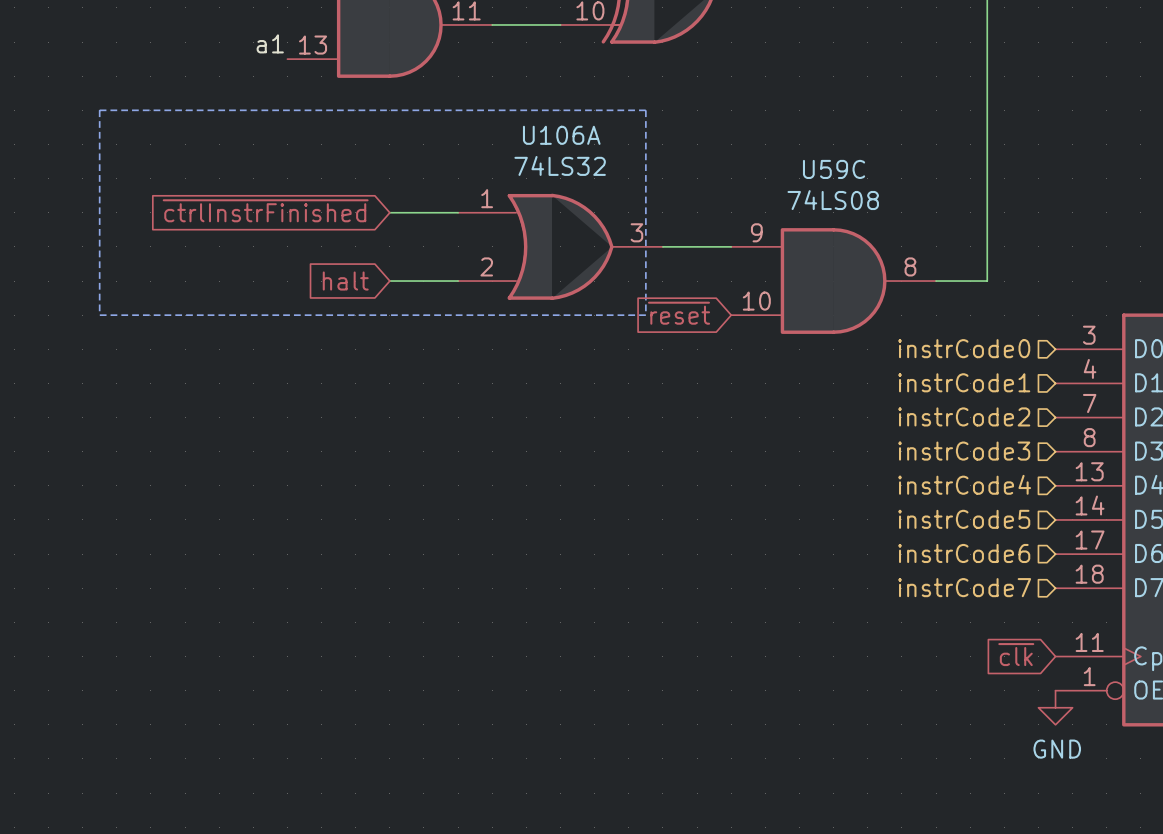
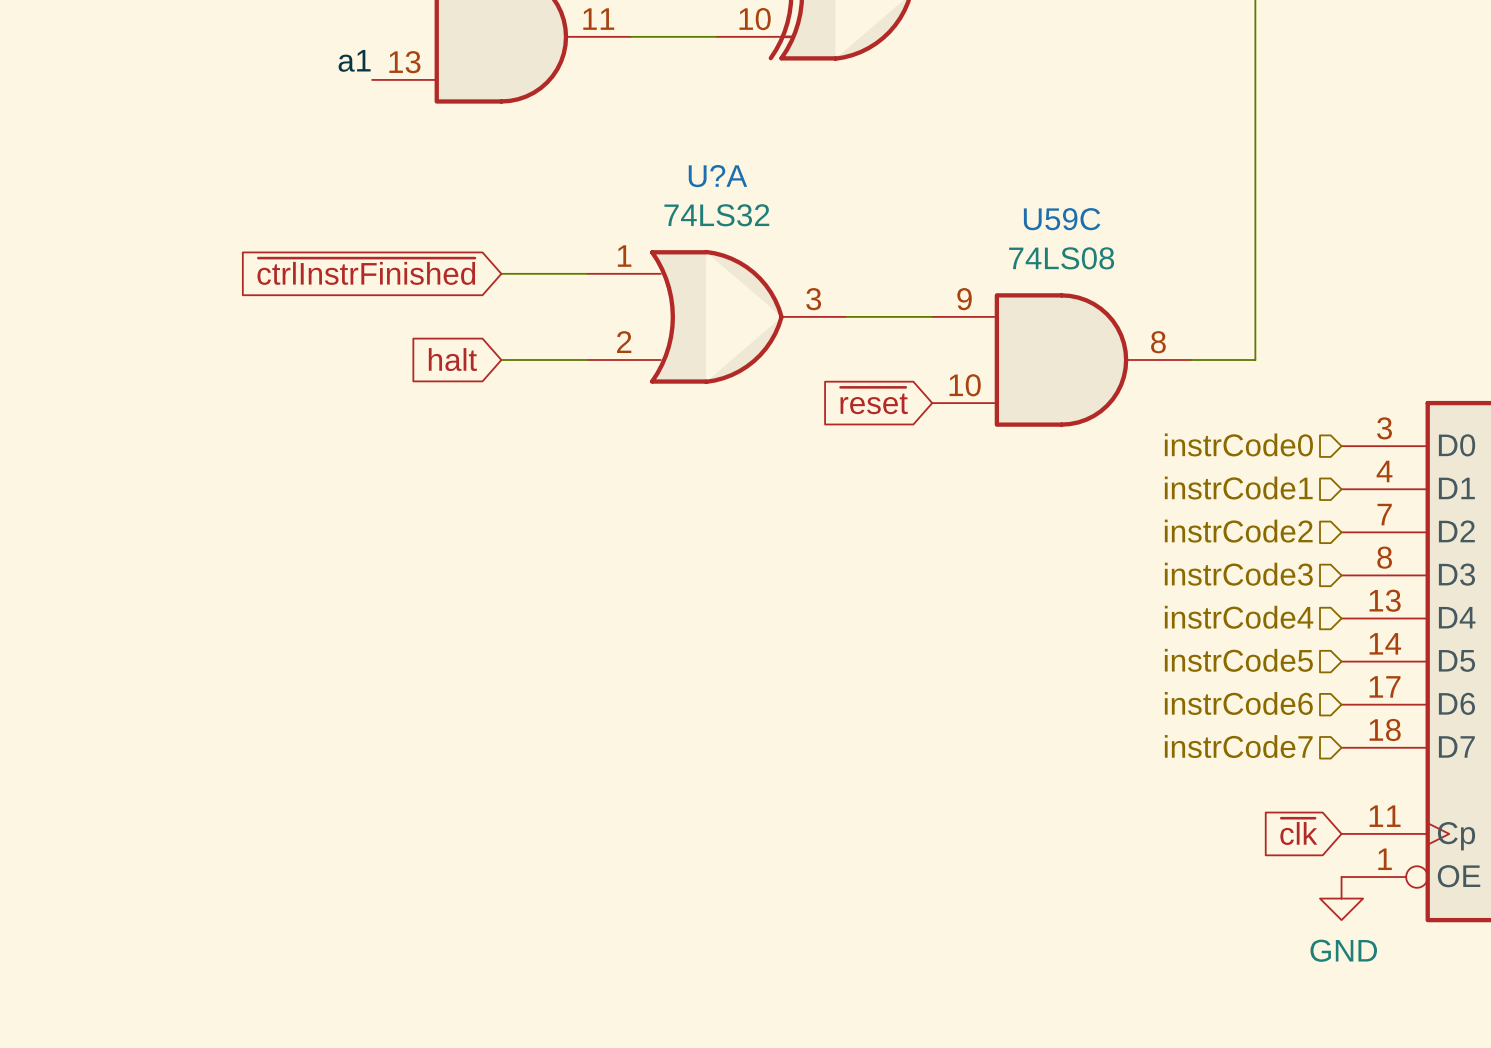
line: (99, 110) (645, 110) (645, 315) (99, 315) (99, 110) -> none
U106A name: U106A (561, 135) -> U?A (717, 176)

